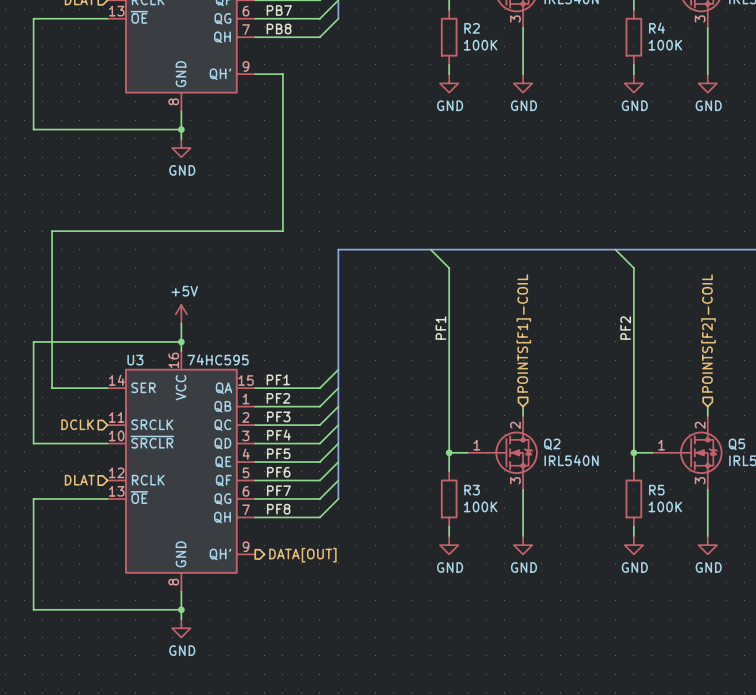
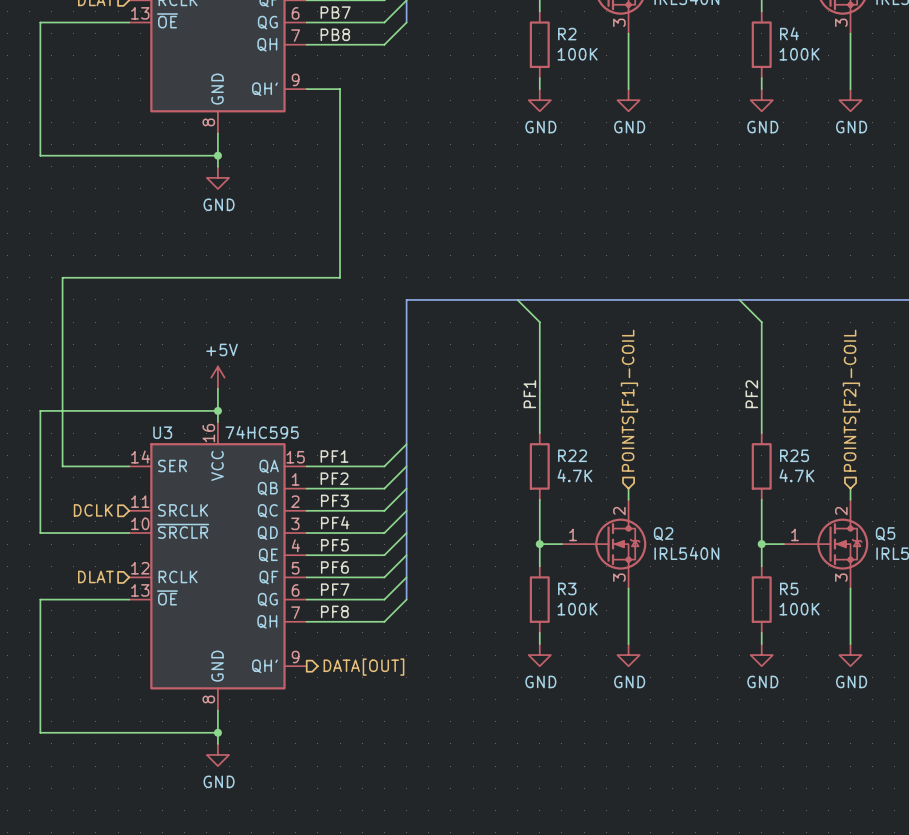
wire: (449, 360) (449, 415) -> none
wire: (633, 360) (633, 415) -> none
R22: none -> 4.7K (539, 466)
R25: none -> 4.7K (761, 466)

